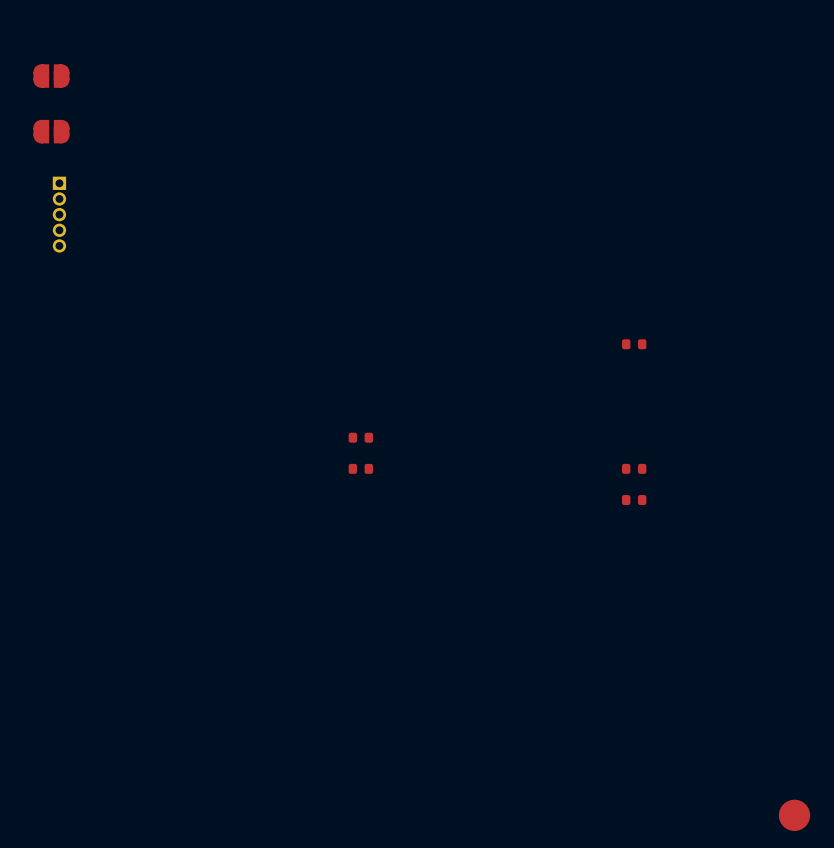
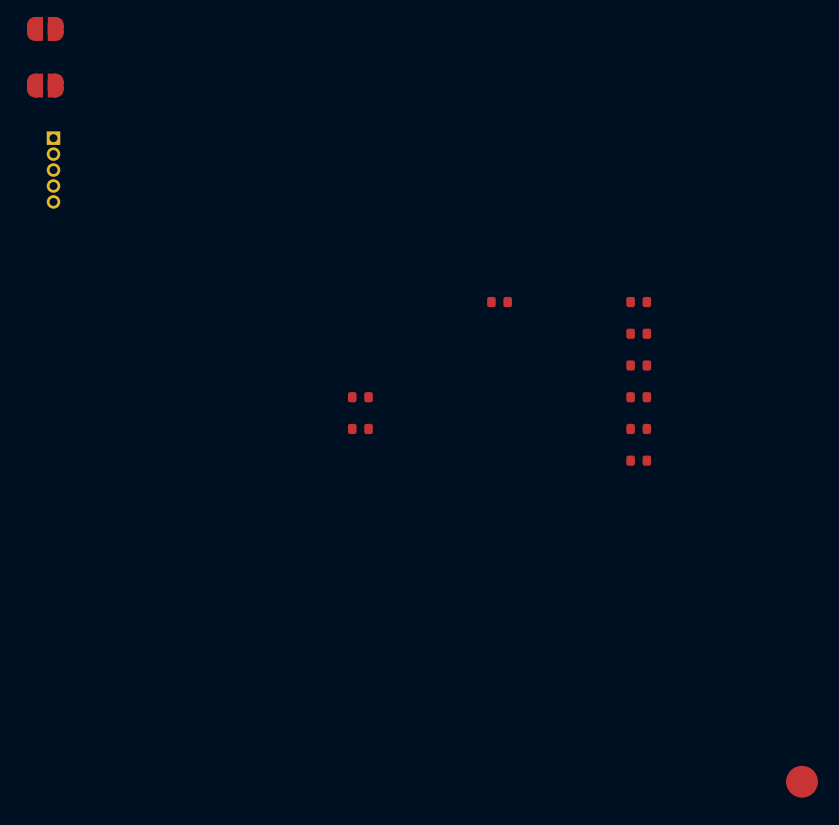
part: none -> (499, 302)
part: none -> (638, 333)
part: none -> (638, 365)
part: none -> (638, 397)

